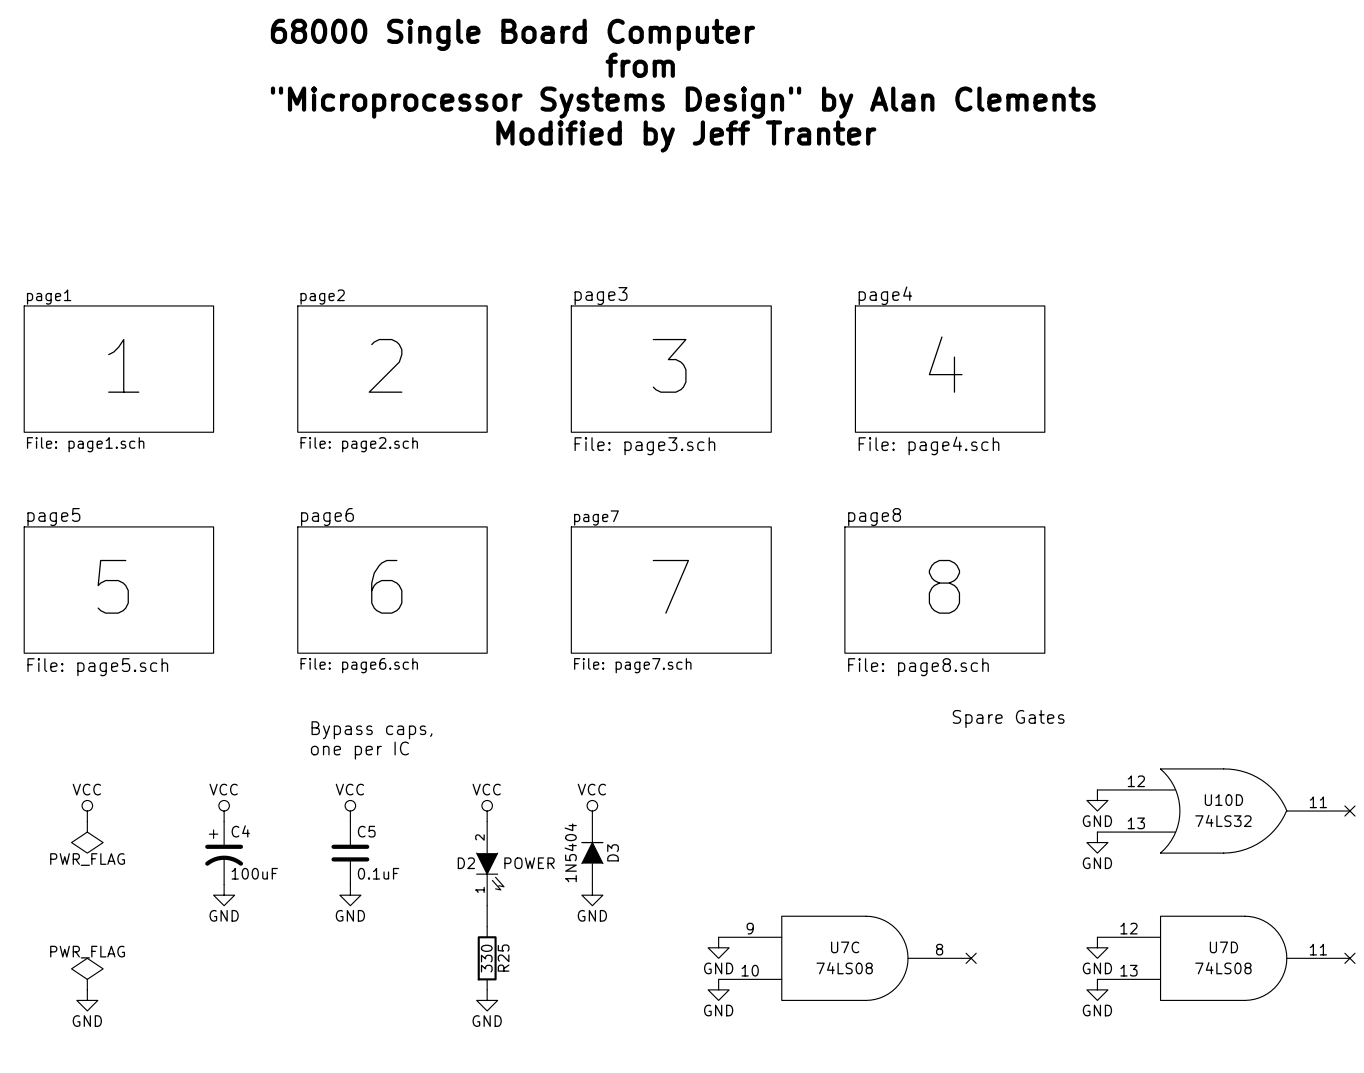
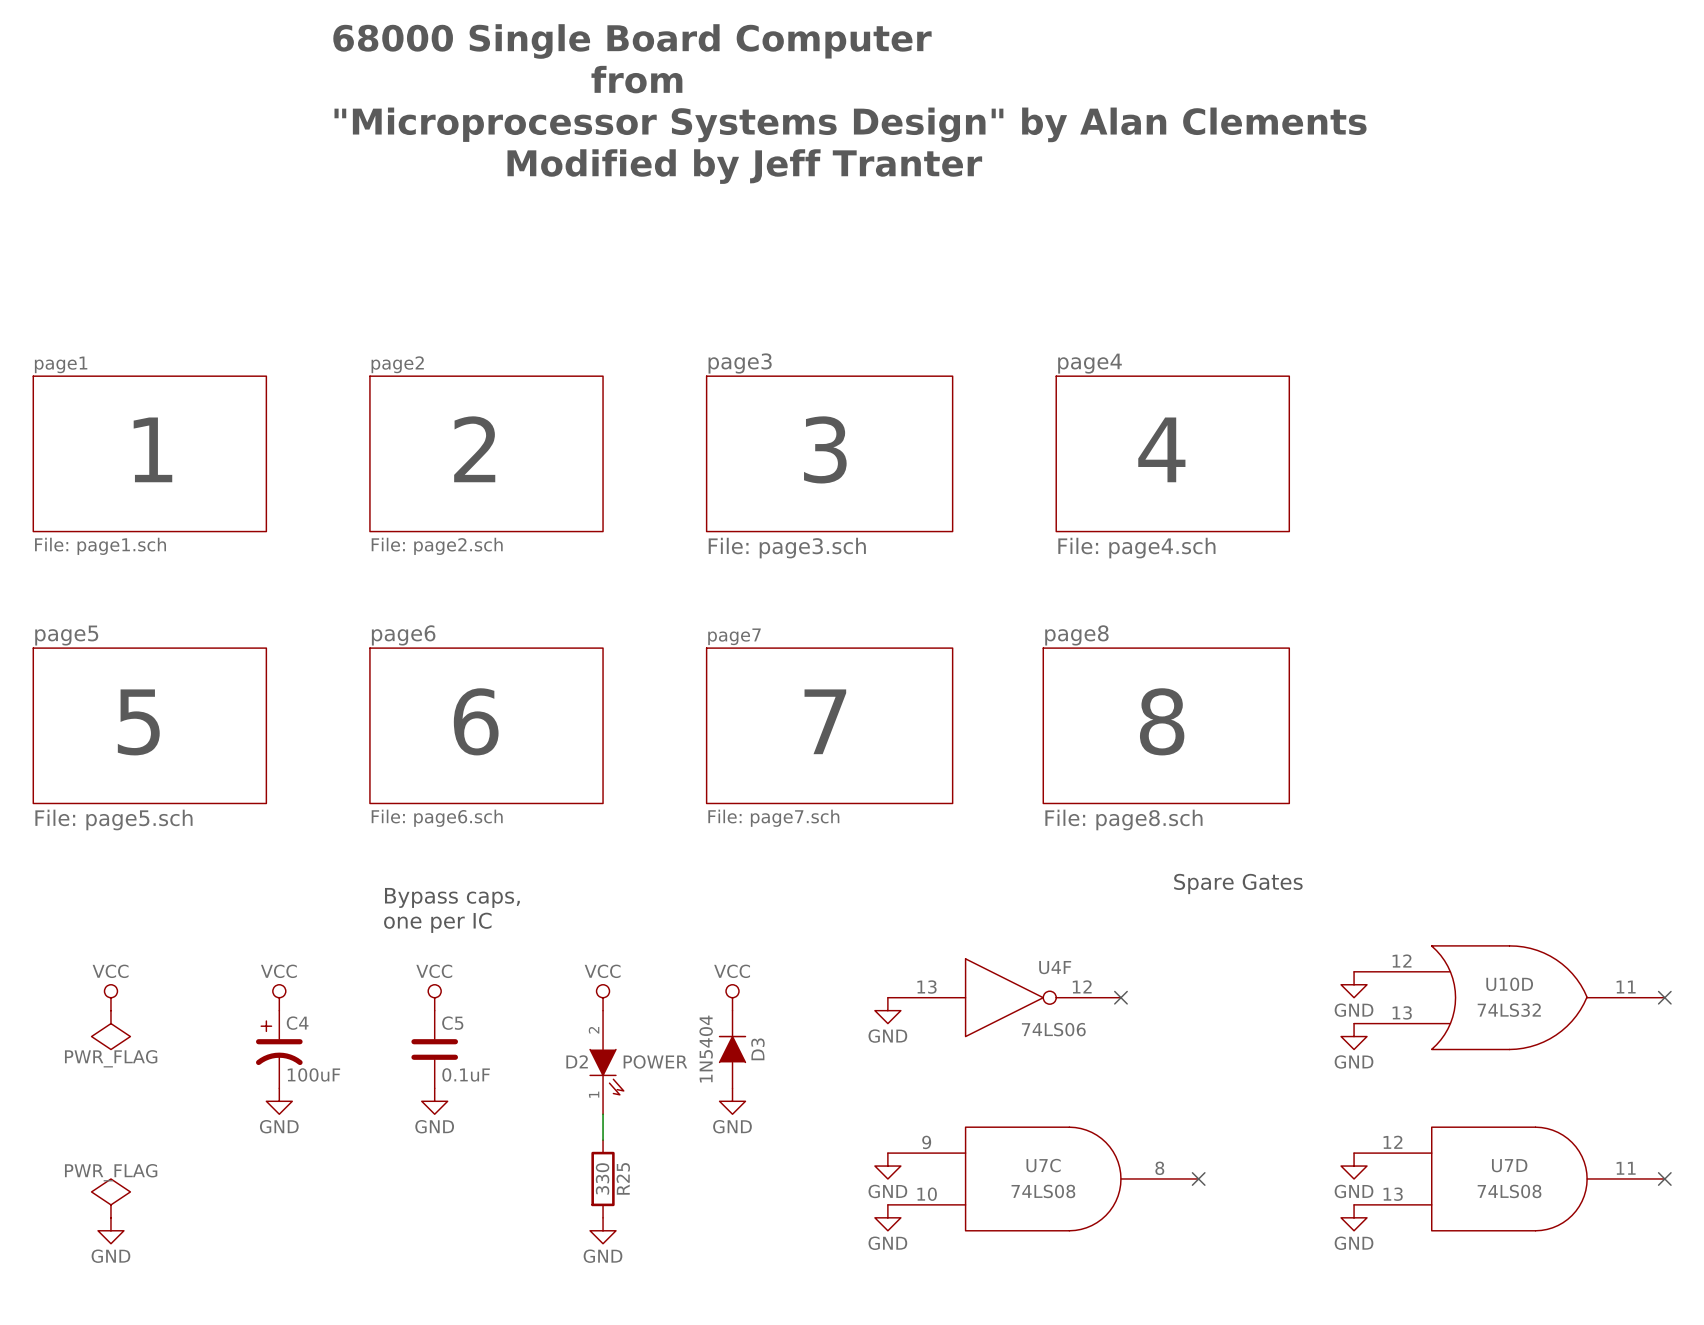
U4F: none -> 74LS06 (1004, 997)
no-connect mark: none -> (1120, 997)
power symbol: none -> GND (887, 1010)

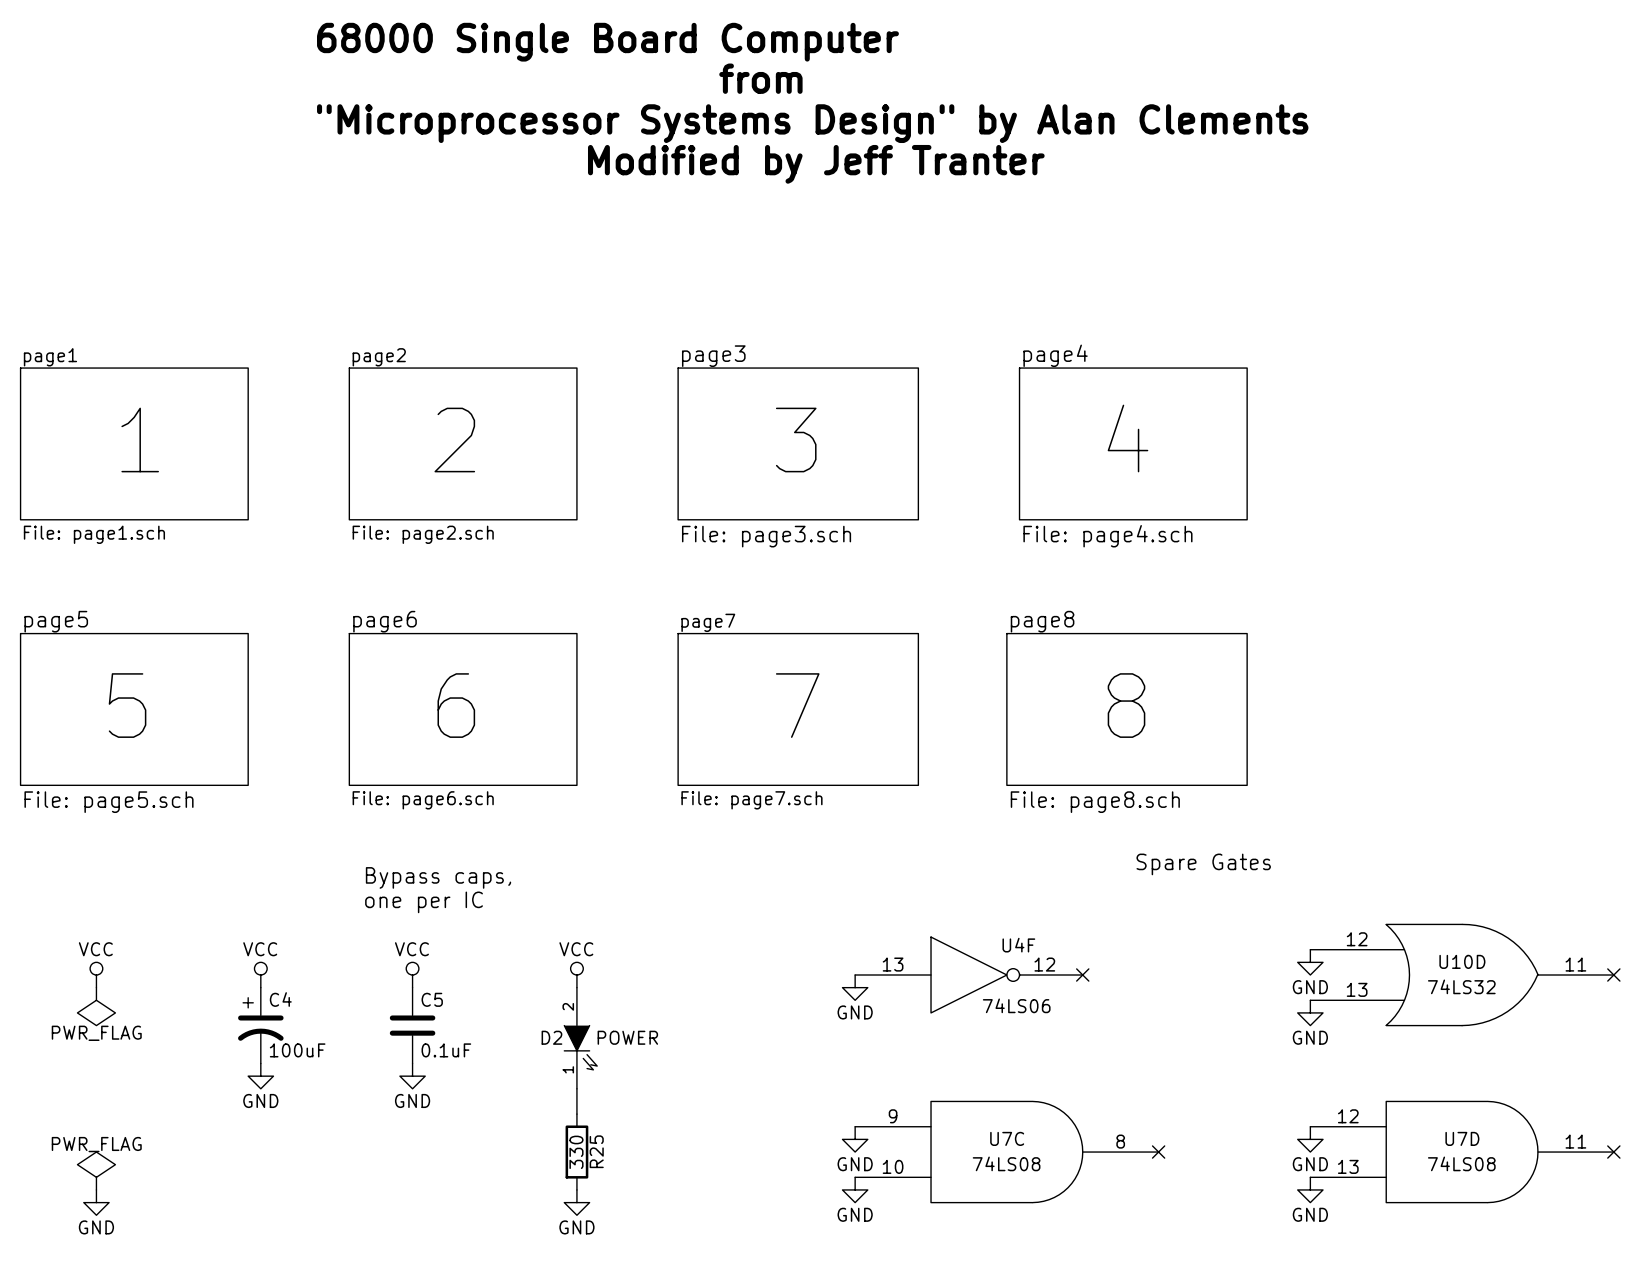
power symbol: VCC (732, 997) -> none
D3: 1N5404 (732, 1049) -> none
power symbol: GND (732, 1101) -> none

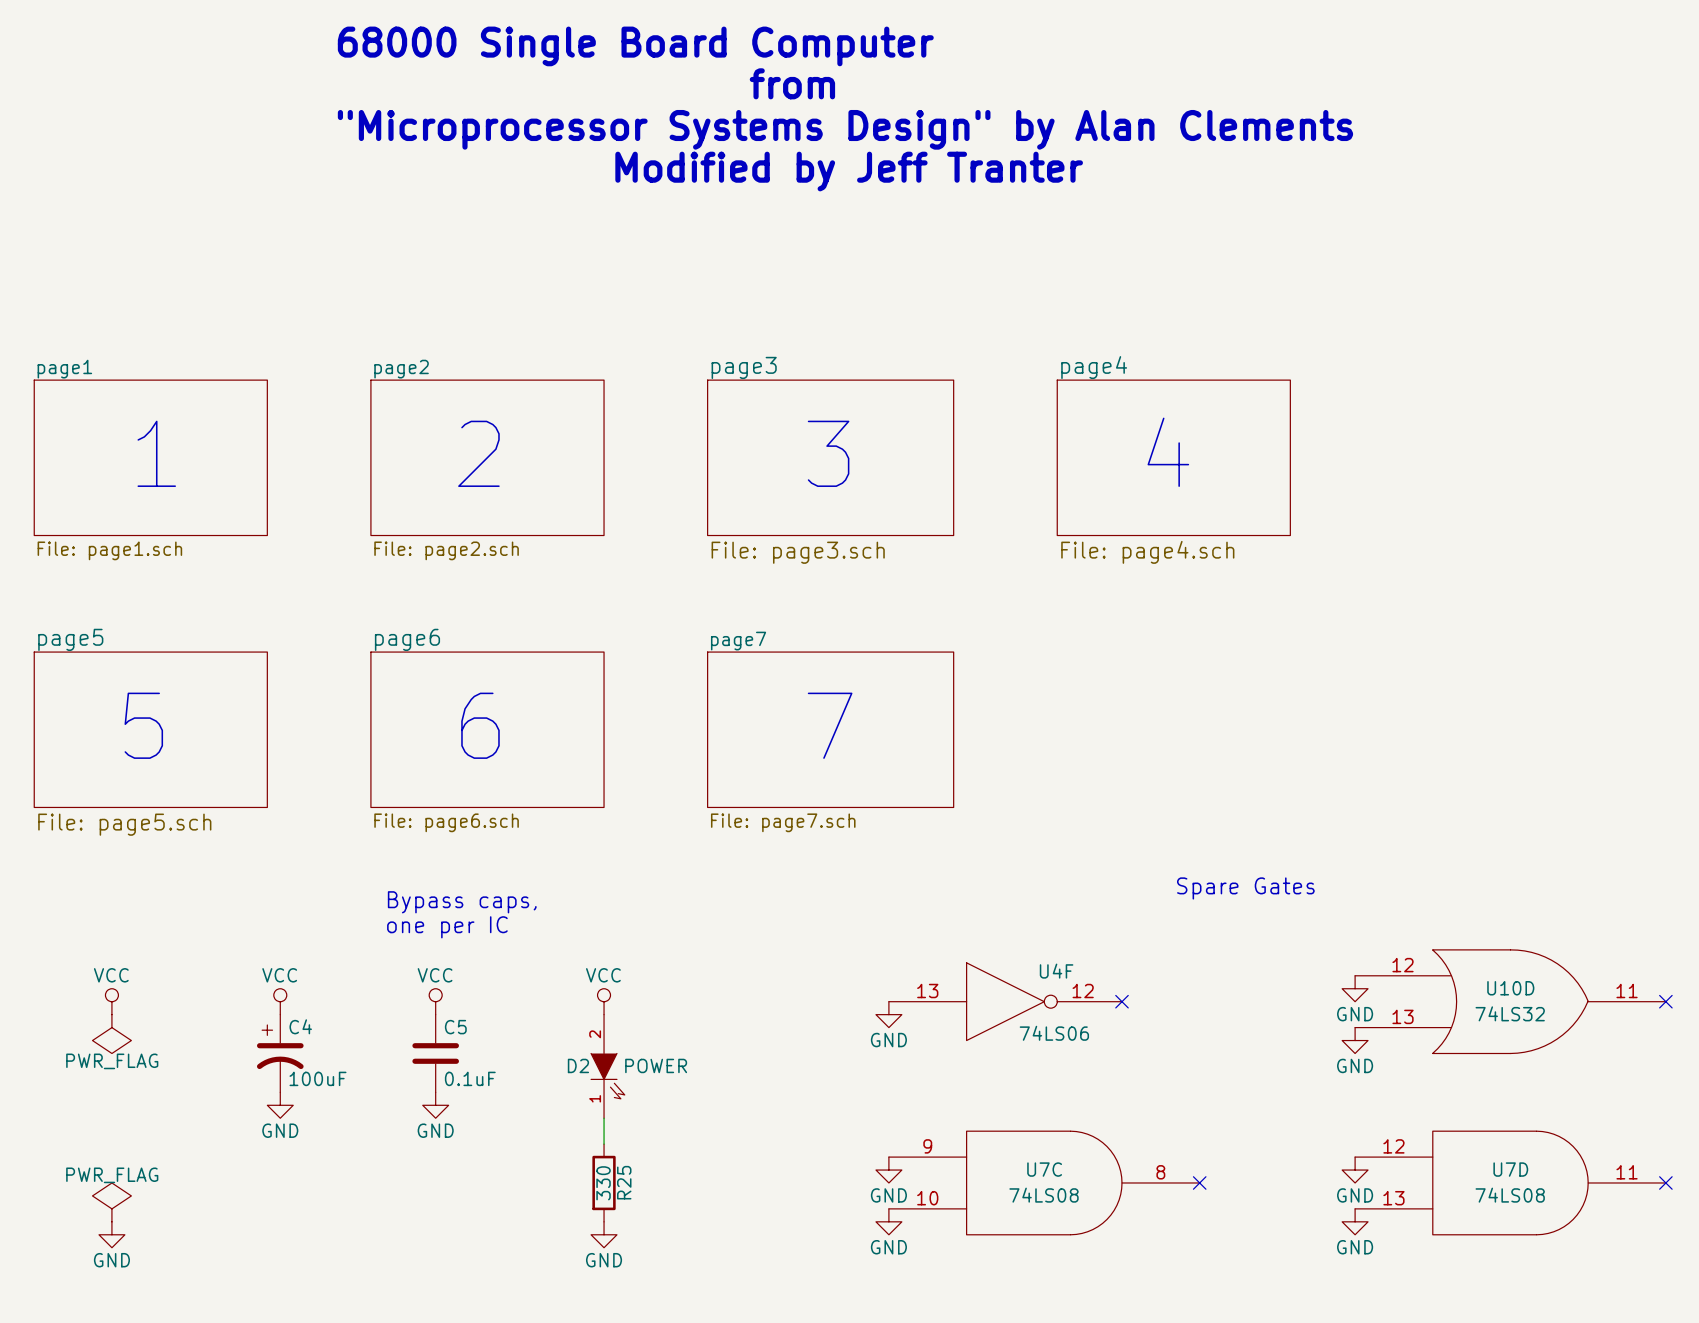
text: 8 (1126, 705) -> none
sheet page8: File: page8.sch (1127, 709) -> none

